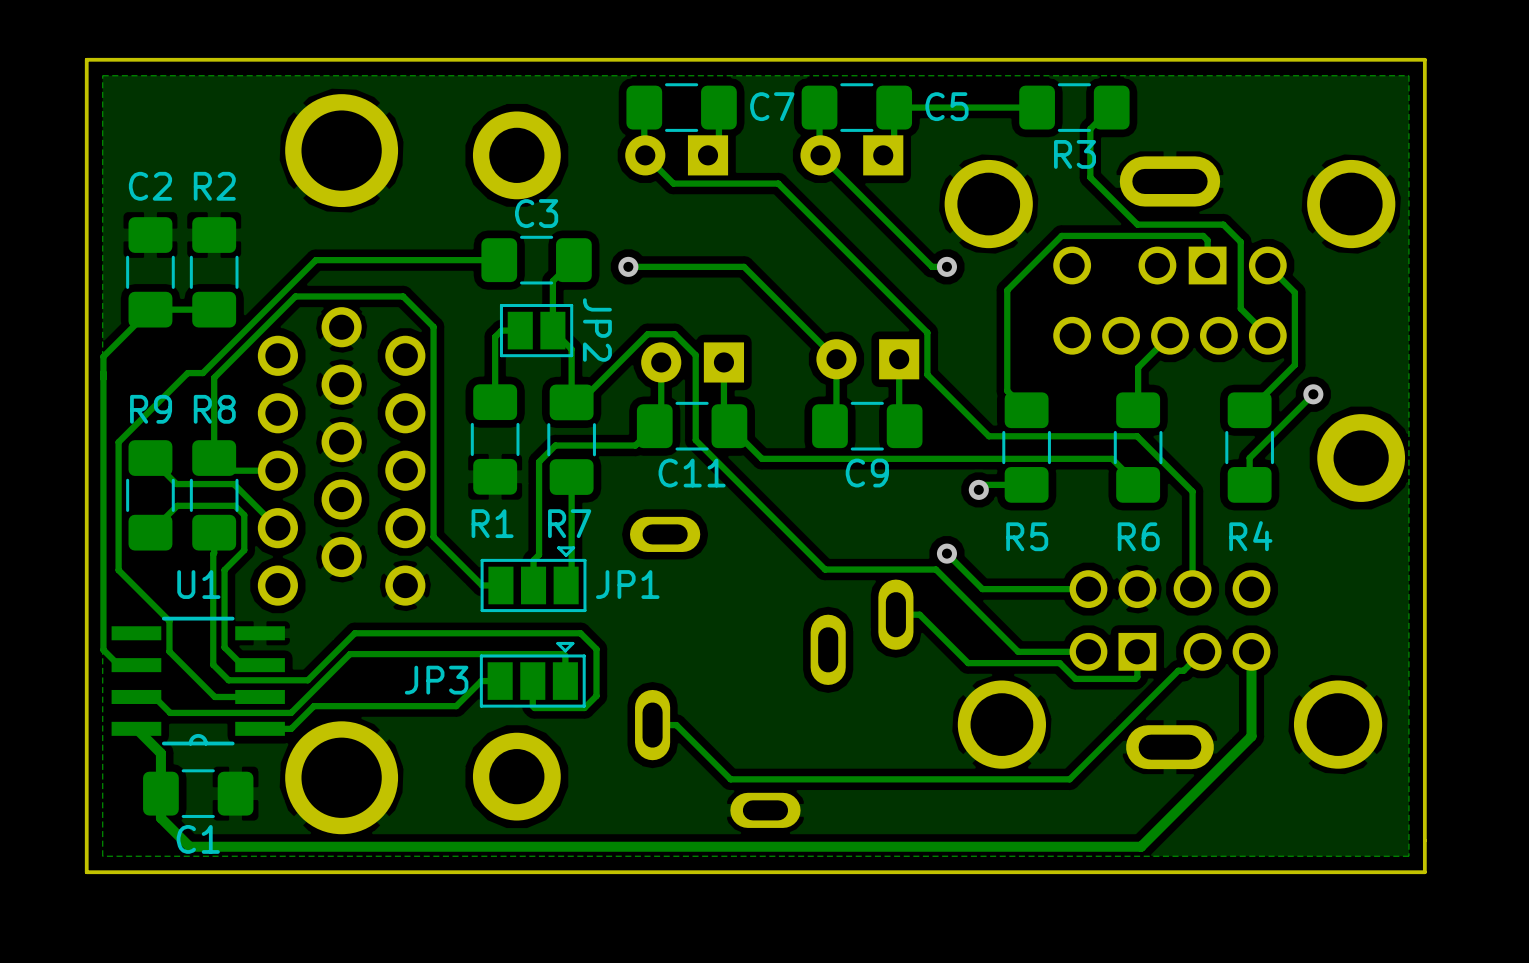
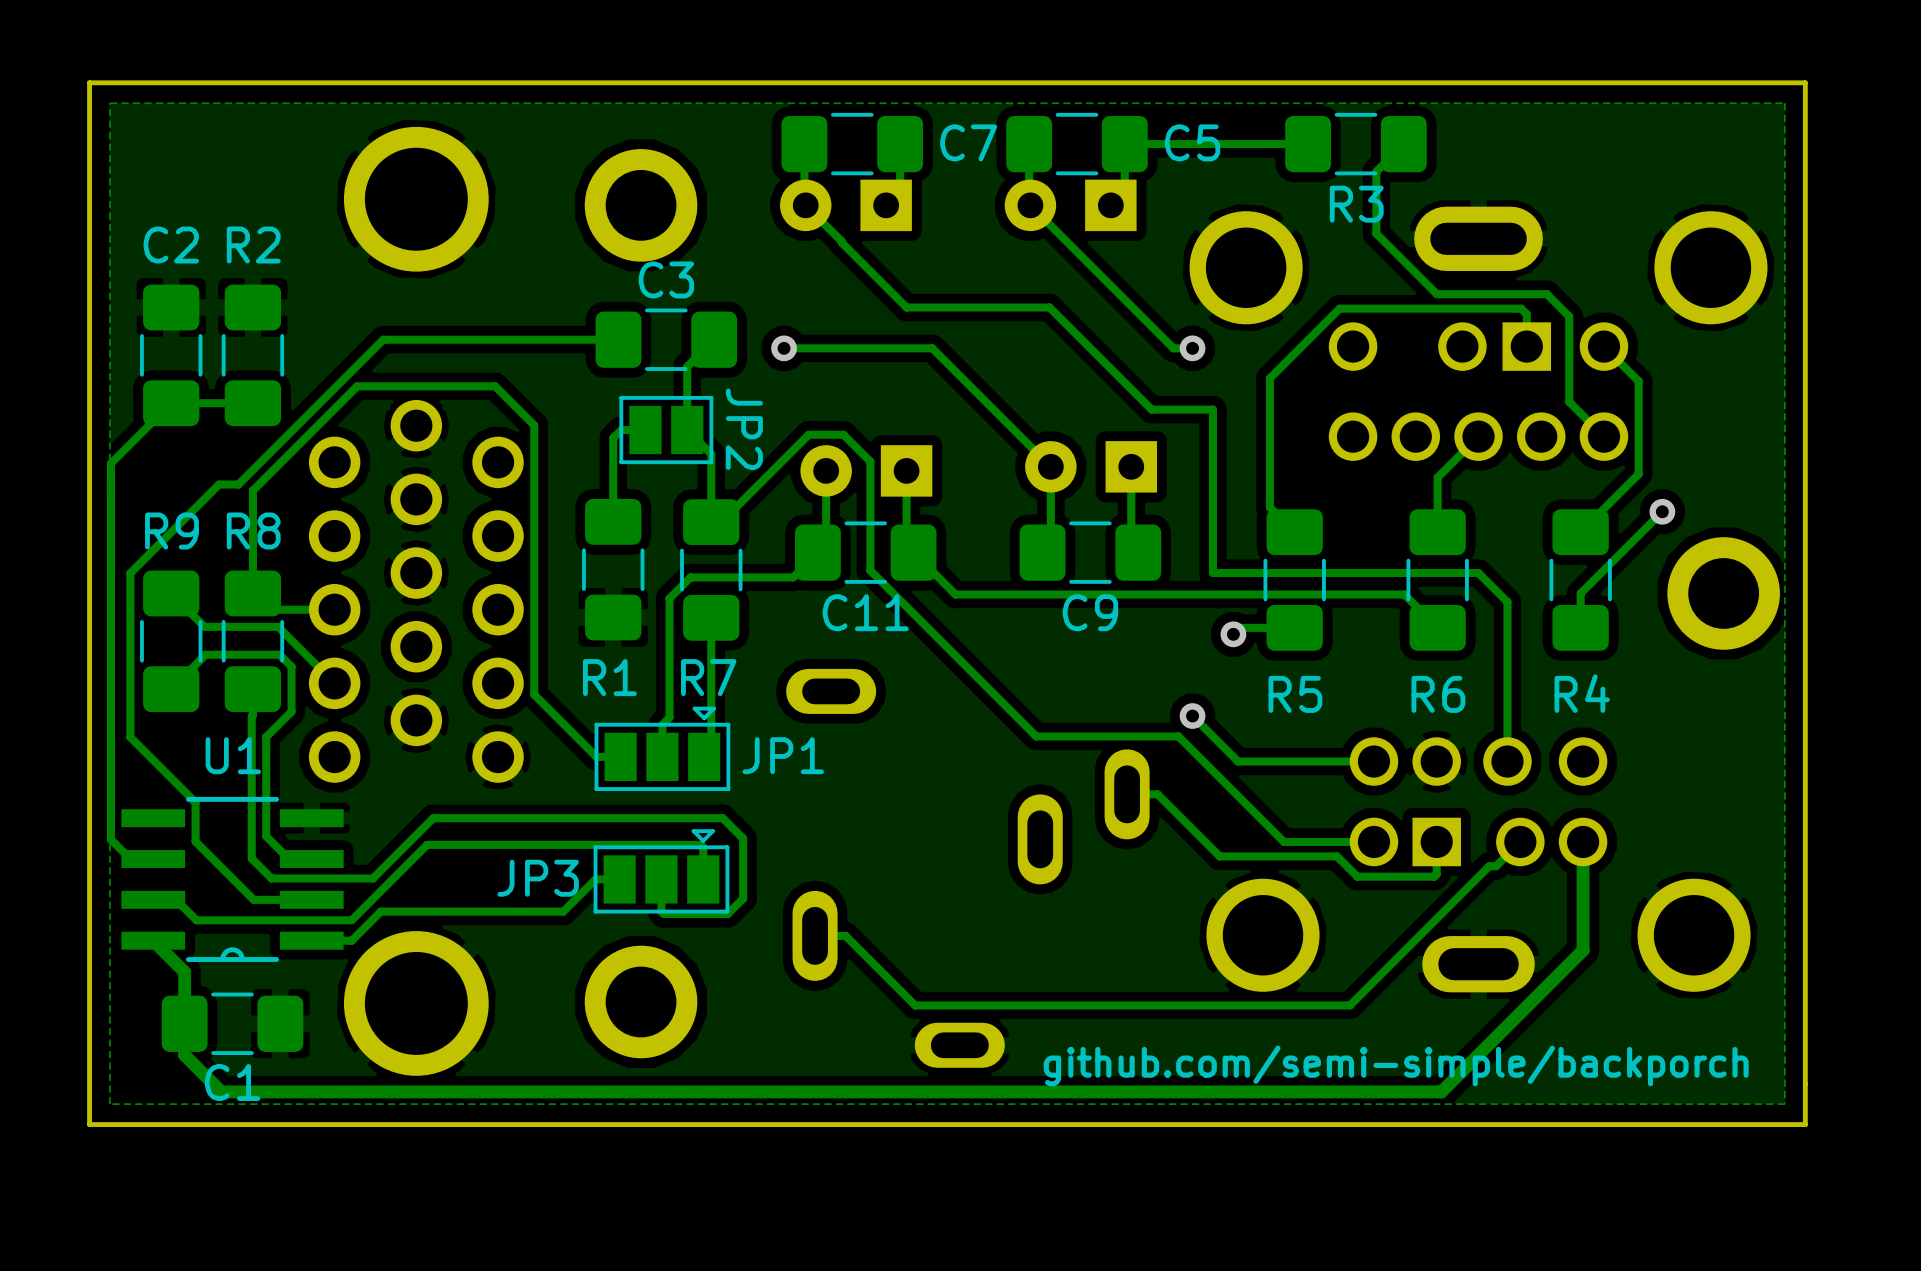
track: (673, 183) (778, 183) (927, 332) (927, 374) (988, 436) (1137, 436) (1192, 491) -> (841, 241) (906, 307) (1049, 307) (1151, 409) (1212, 409) (1212, 573) (1478, 573) (1507, 601) (1507, 636)
text: none -> github.com/semi-simple/backporch (1396, 1065)

